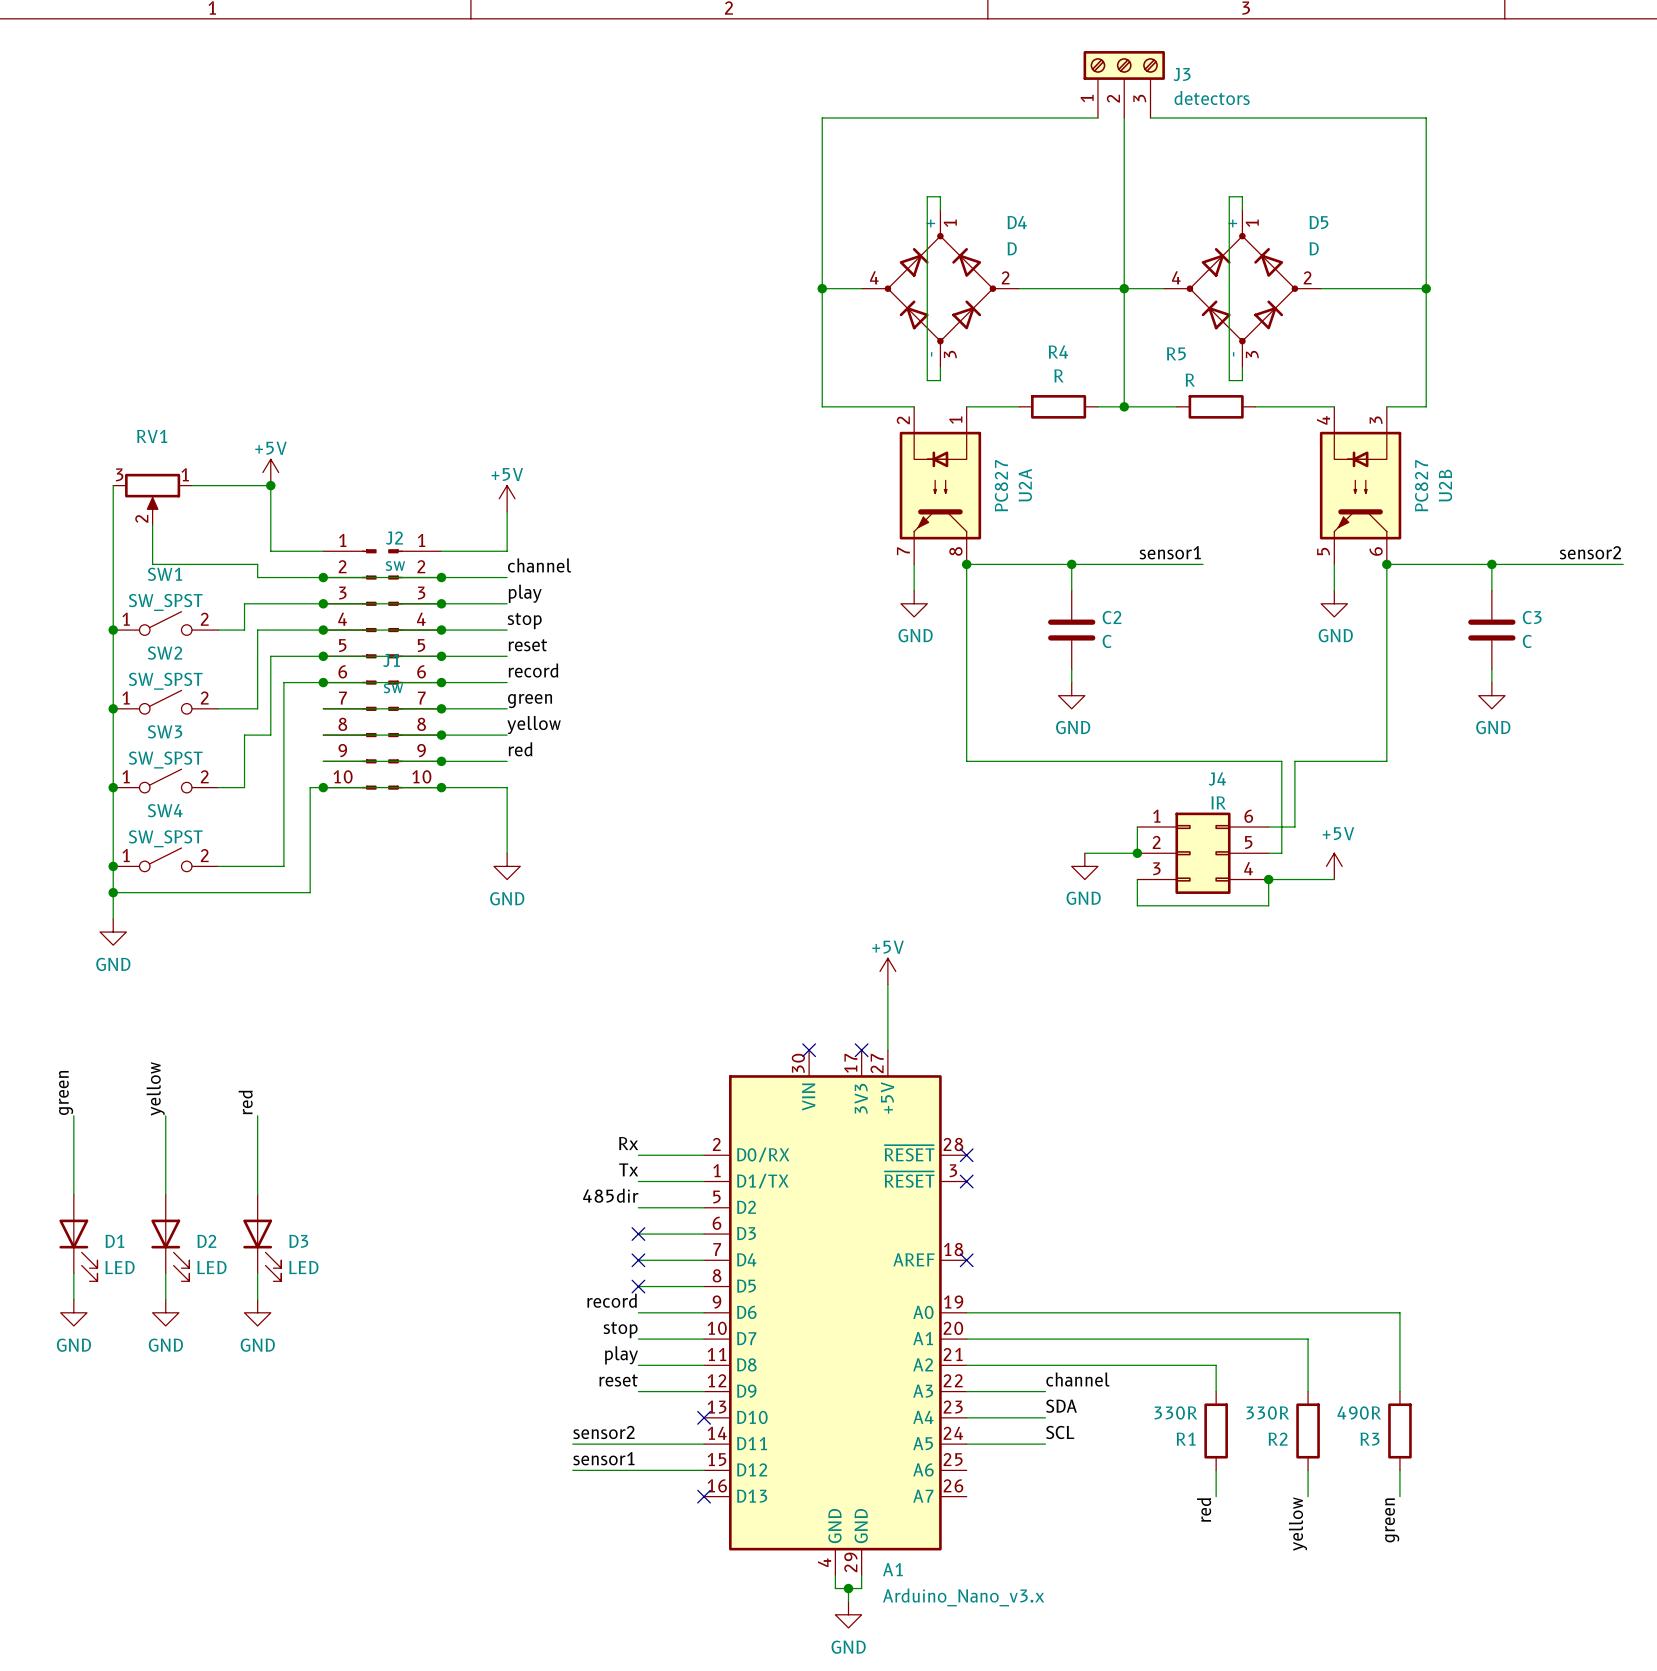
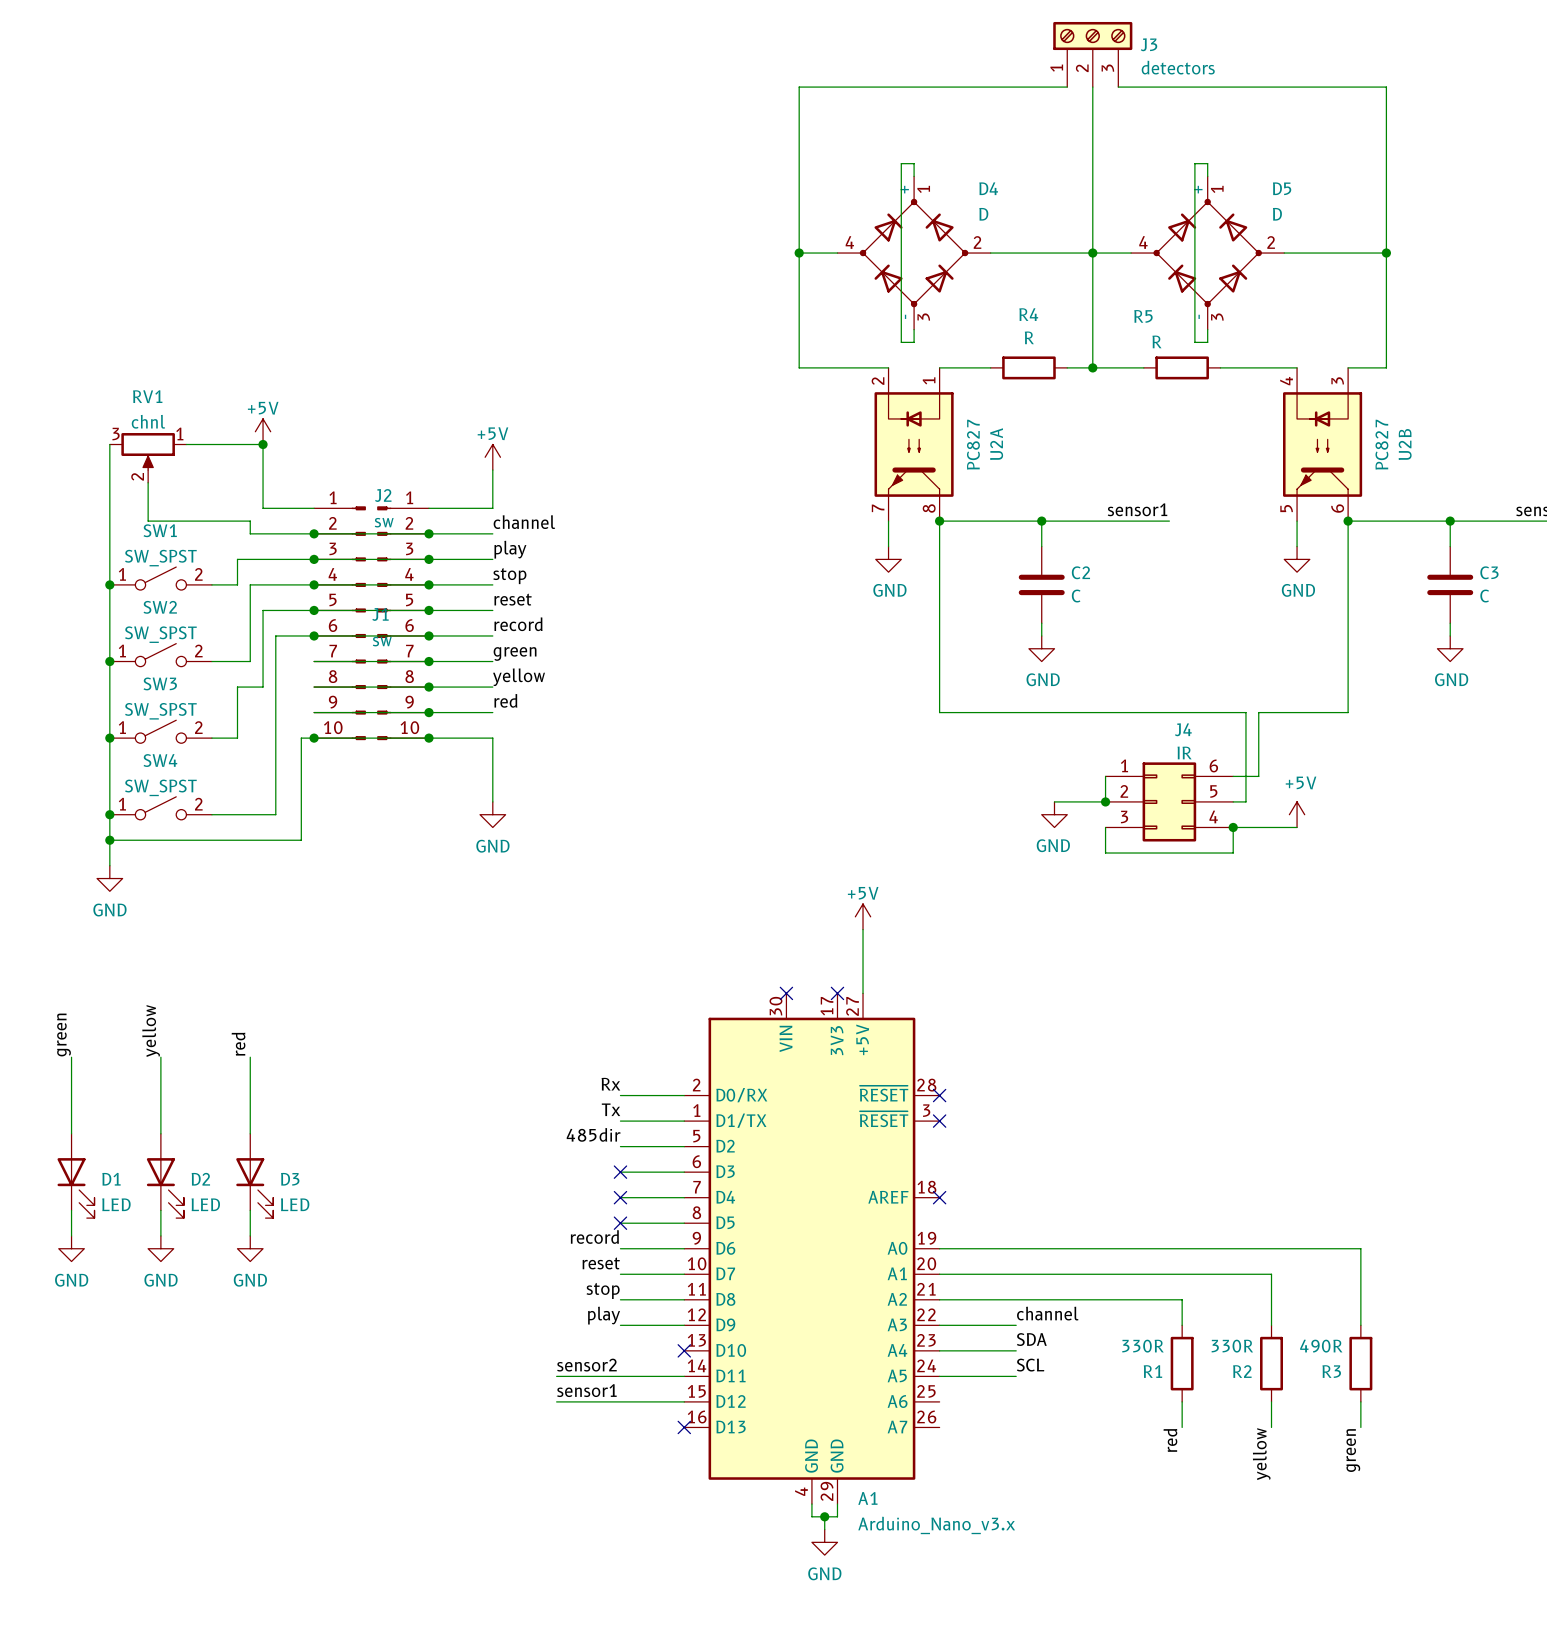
RV1 value: none -> chnl (148, 421)
label: stop (620, 1329) -> reset (601, 1263)
label: play (621, 1355) -> stop (603, 1290)
label: reset (618, 1380) -> play (604, 1315)

